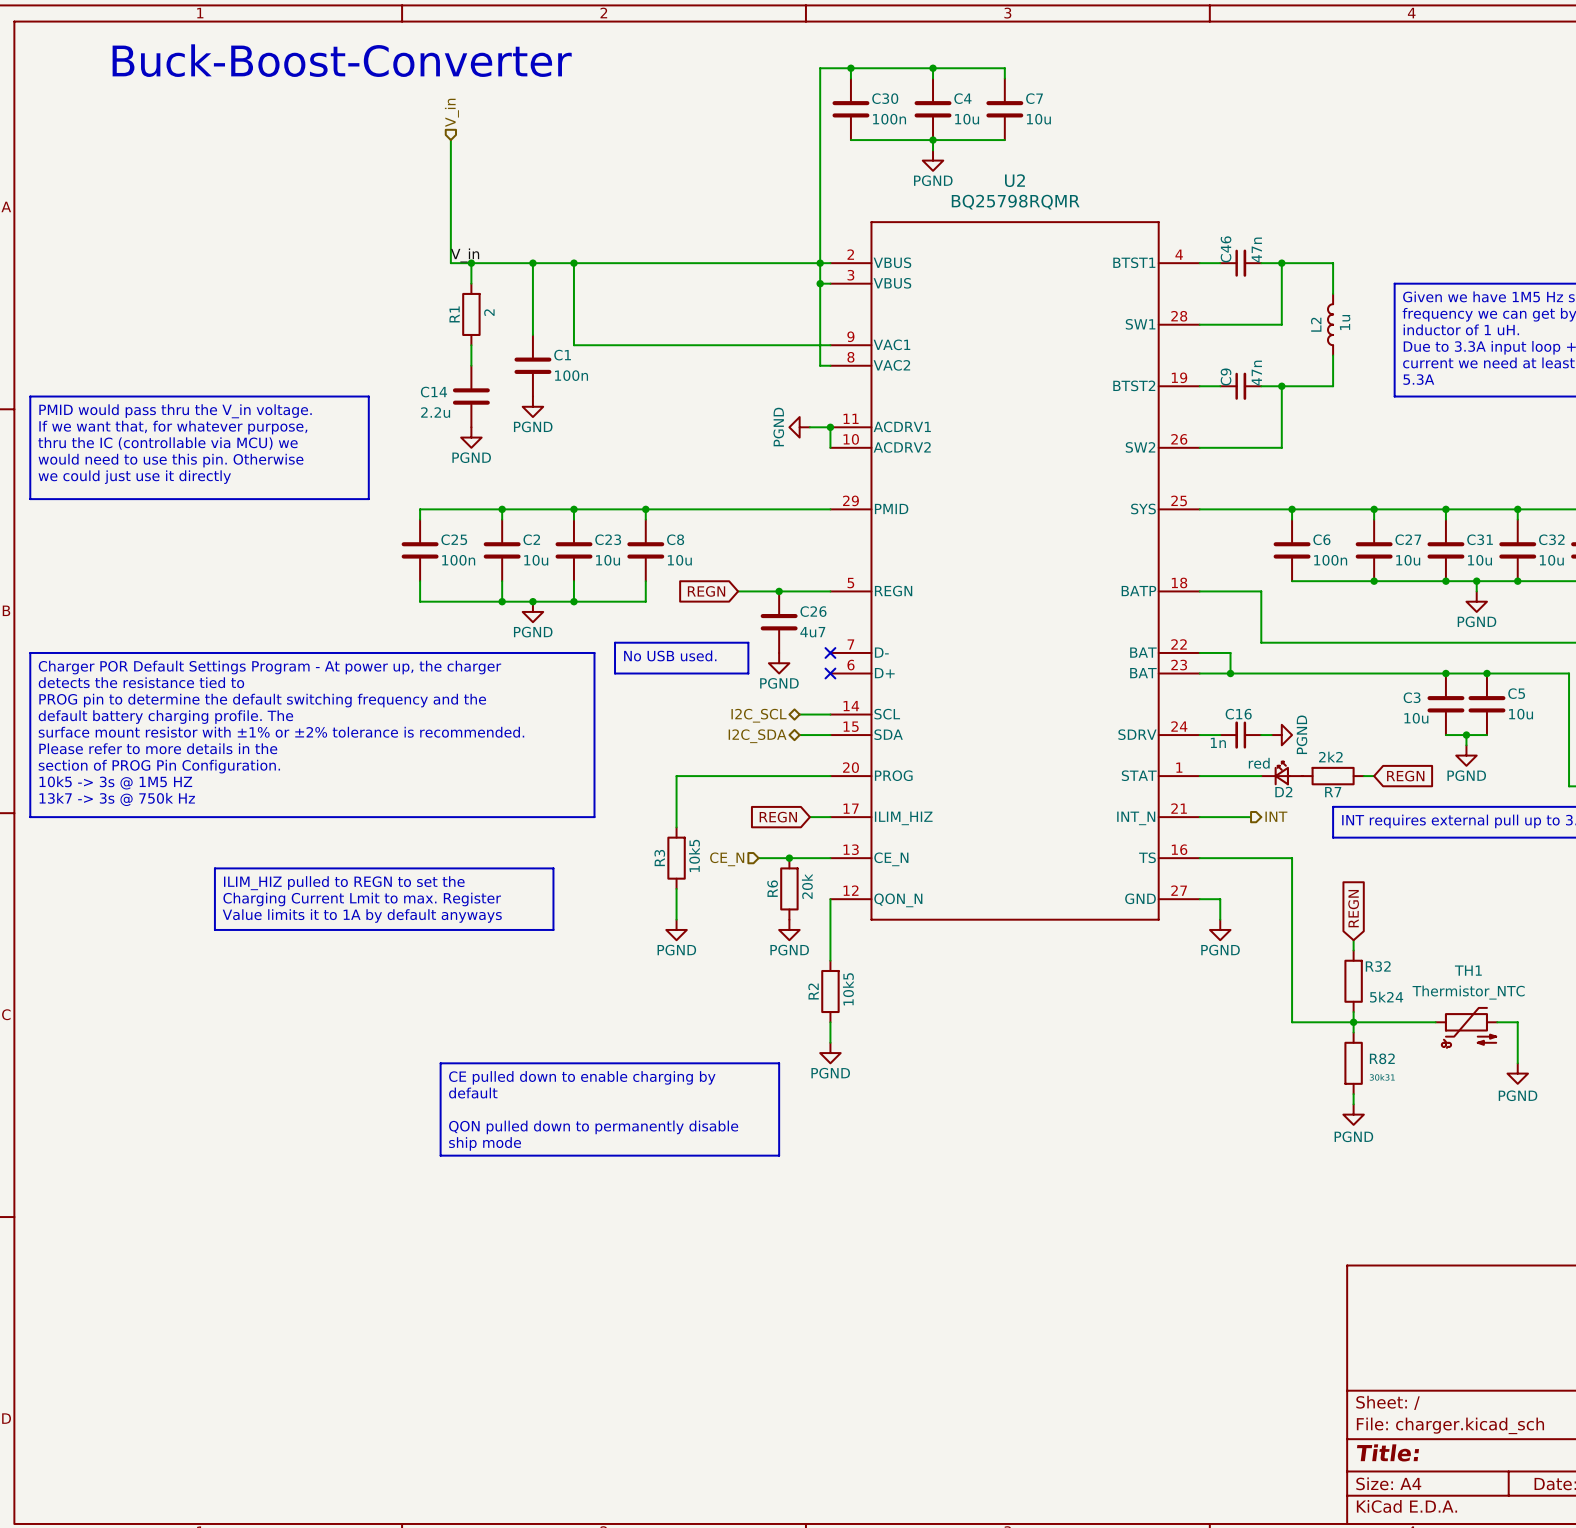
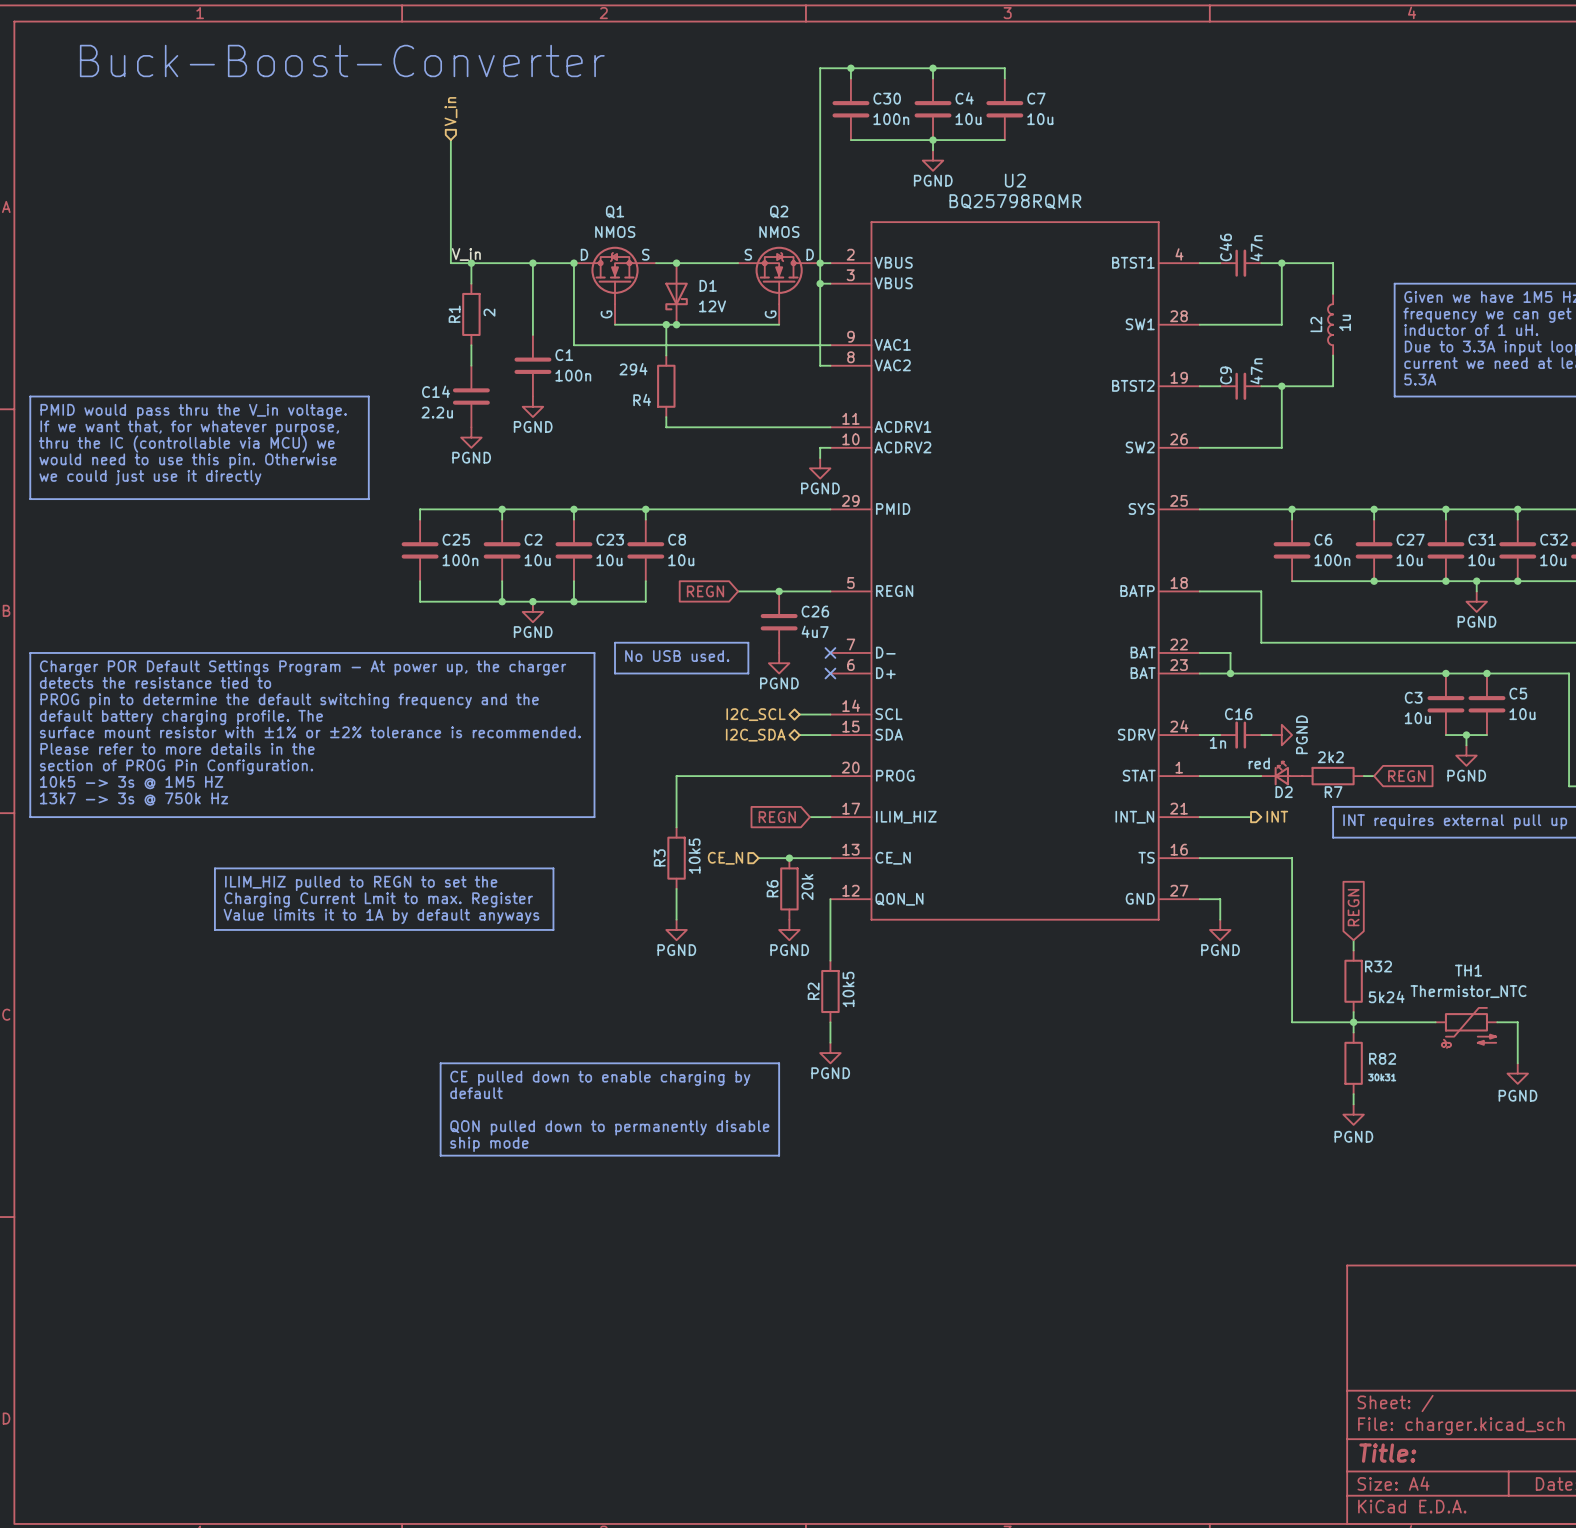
junction: none -> (676, 263)
Q1: none -> NMOS (615, 285)
Q2: none -> NMOS (779, 285)
D1: none -> 12V (676, 293)
wire: none -> (615, 324) (779, 324)
wire: none -> (666, 324) (666, 355)
junction: none -> (666, 324)
junction: none -> (676, 324)
R4: none -> 294 (666, 386)
wire: none -> (666, 417) (666, 427) (809, 427)
power symbol rotation: 0° (799, 427) -> 90° counterclockwise (820, 468)
power symbol position: PGND (799, 427) -> PGND (820, 468)
wire: (830, 427) (830, 447) -> (820, 458) (820, 447) (830, 447)
junction: (830, 427) -> none

